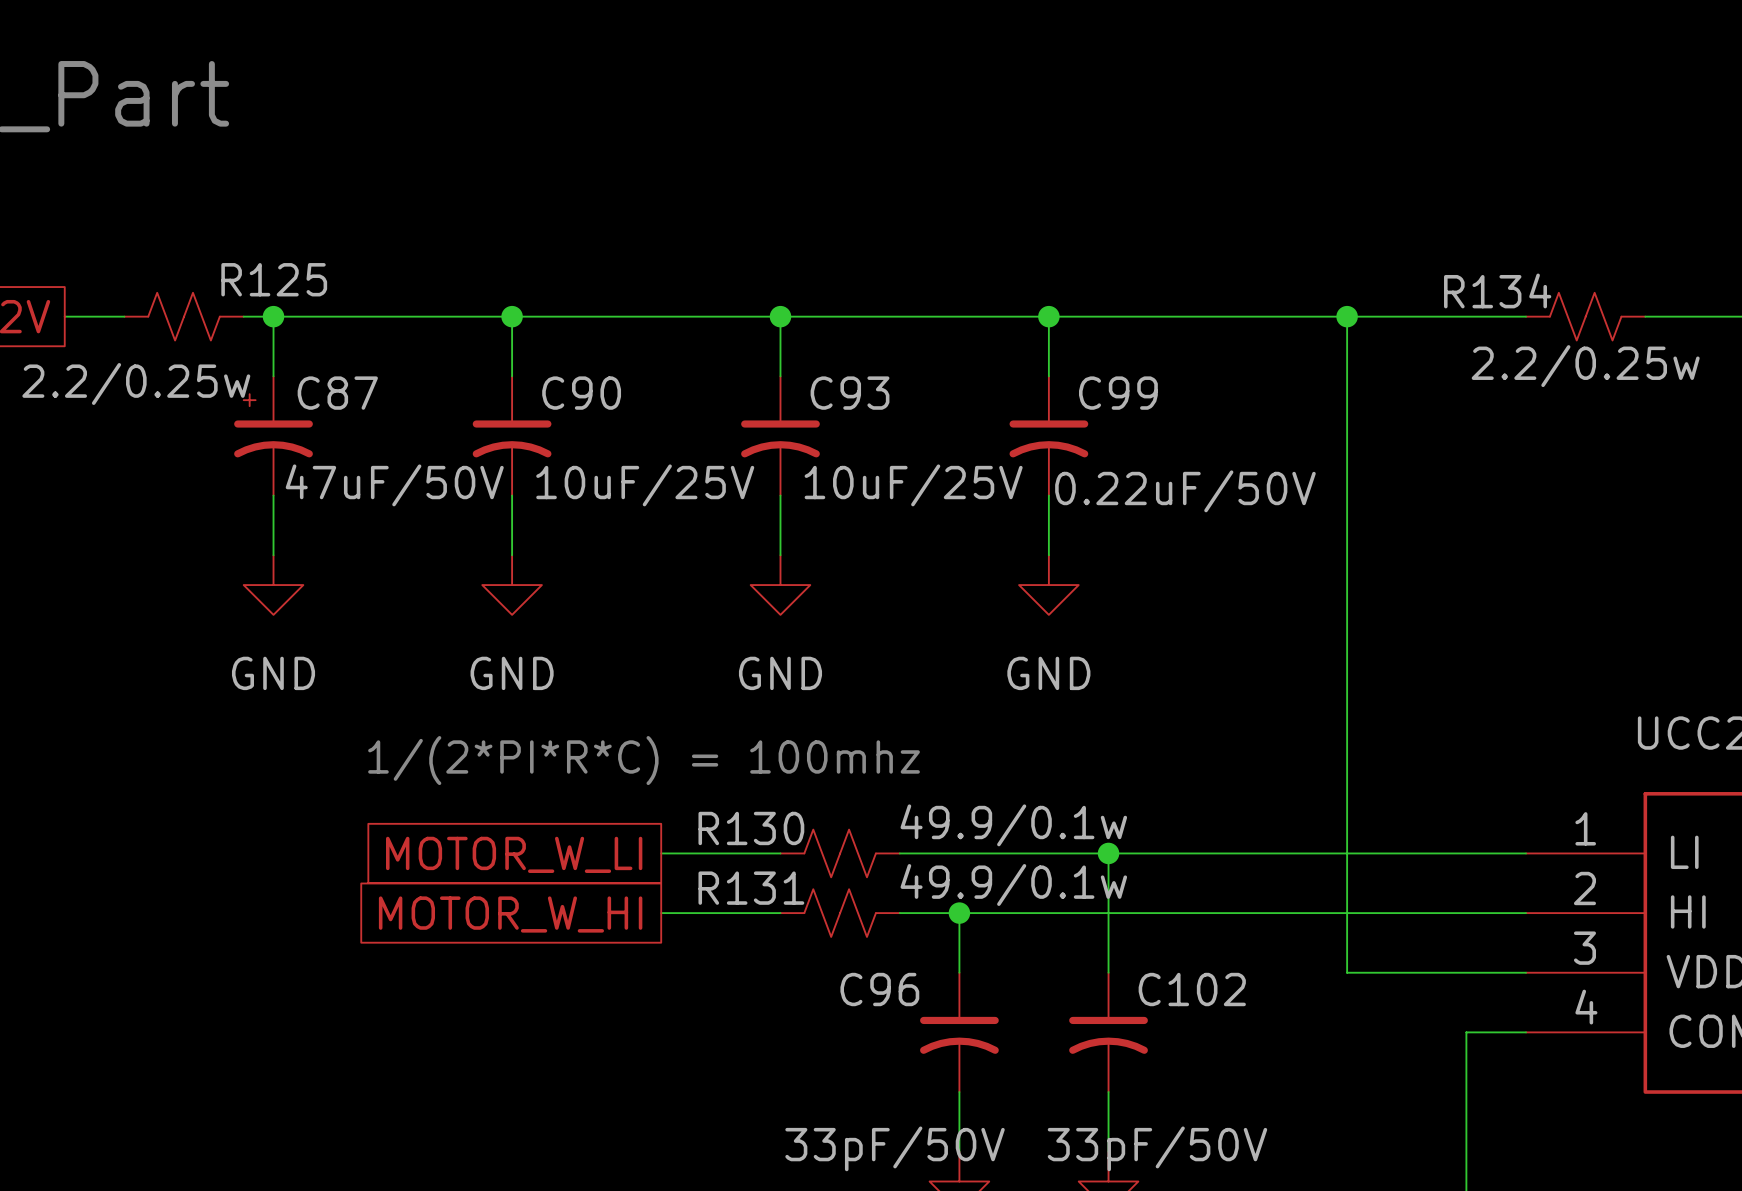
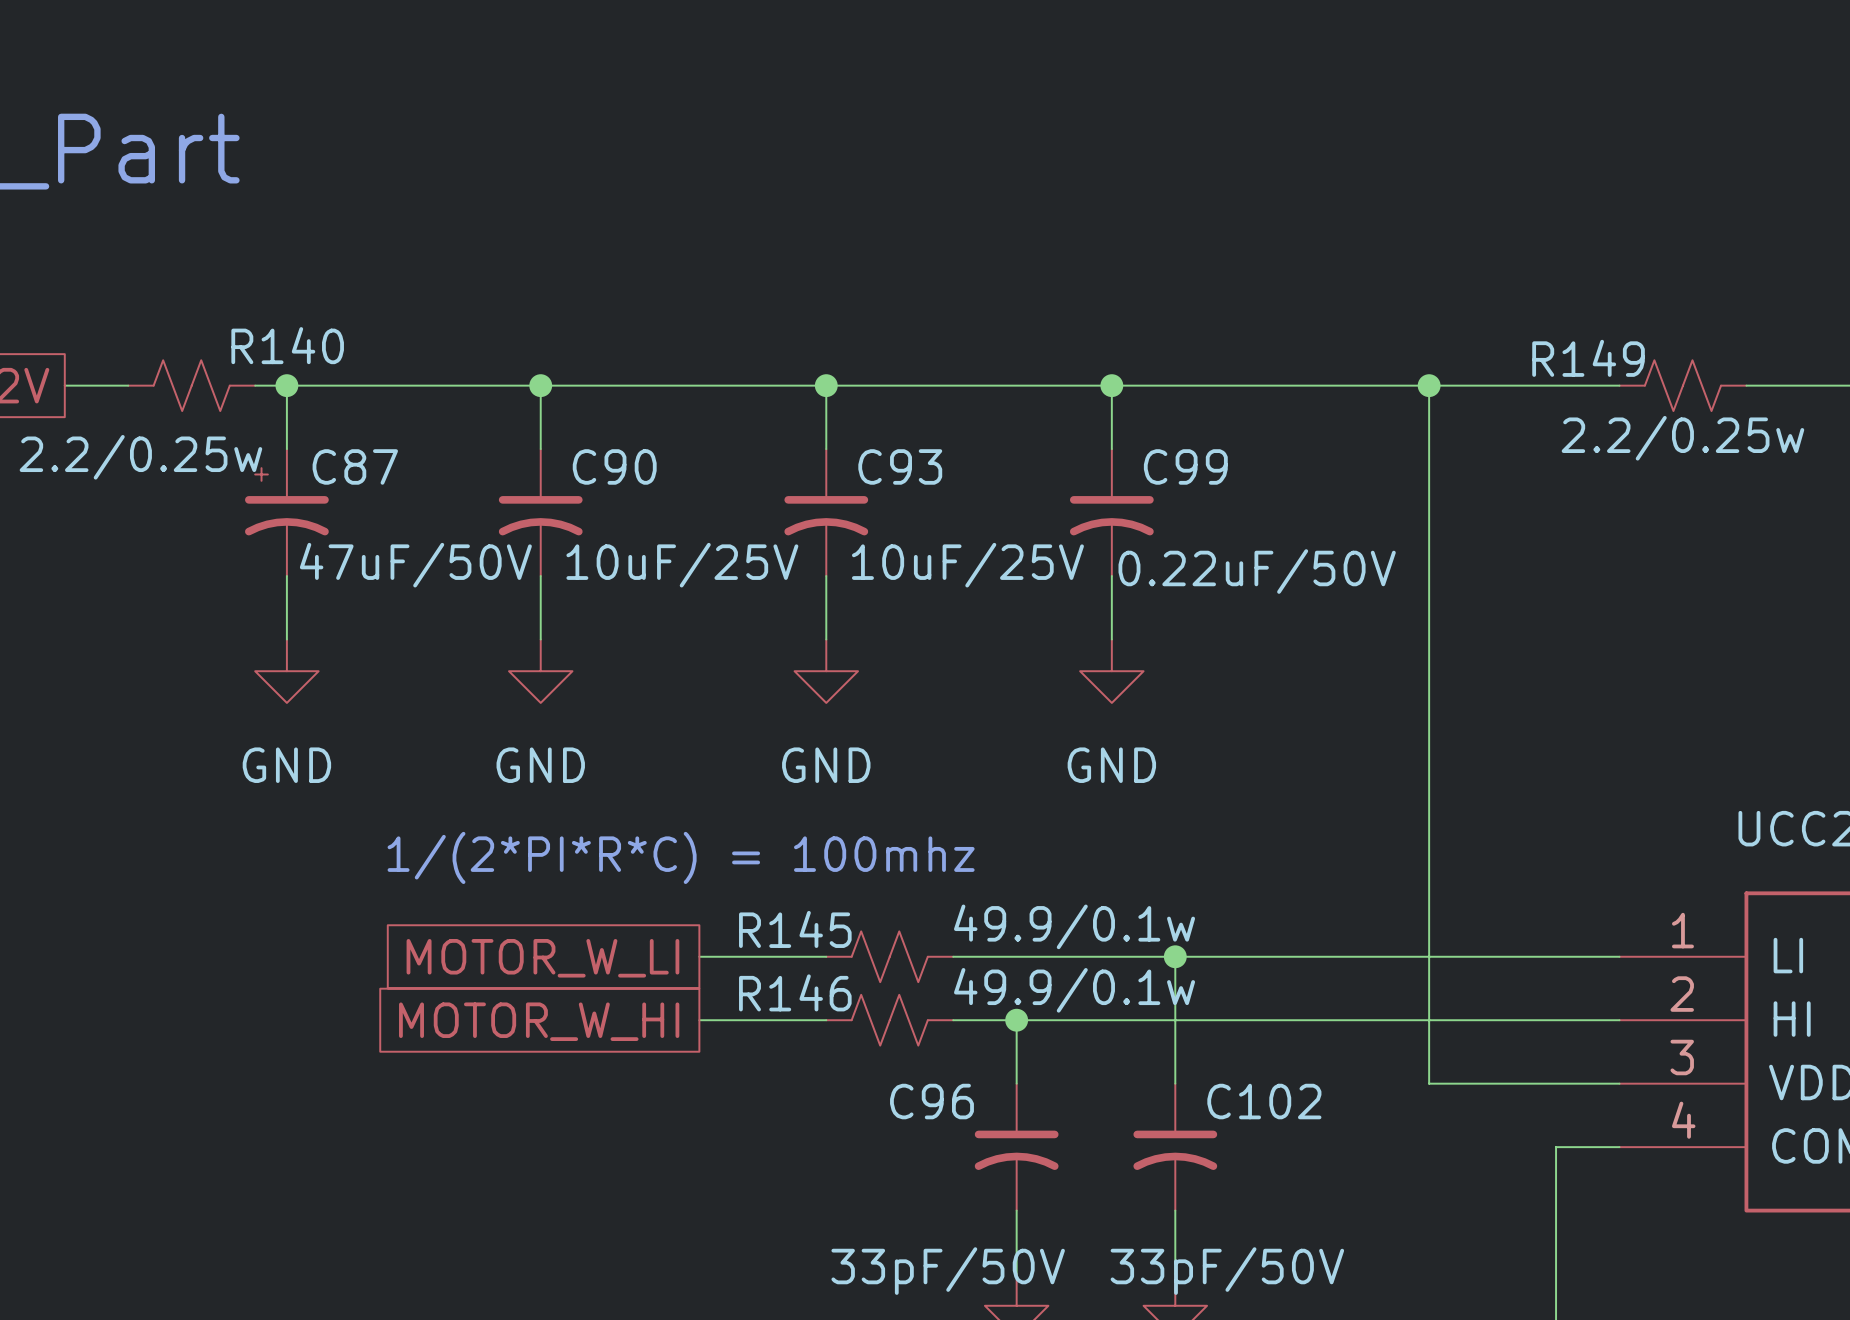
R125 name: R125 (274, 279) -> R140 (287, 345)
R134 name: R134 (1497, 290) -> R149 (1588, 358)
R130 name: R130 (751, 828) -> R145 (795, 929)
R131 name: R131 (751, 888) -> R146 (795, 992)

